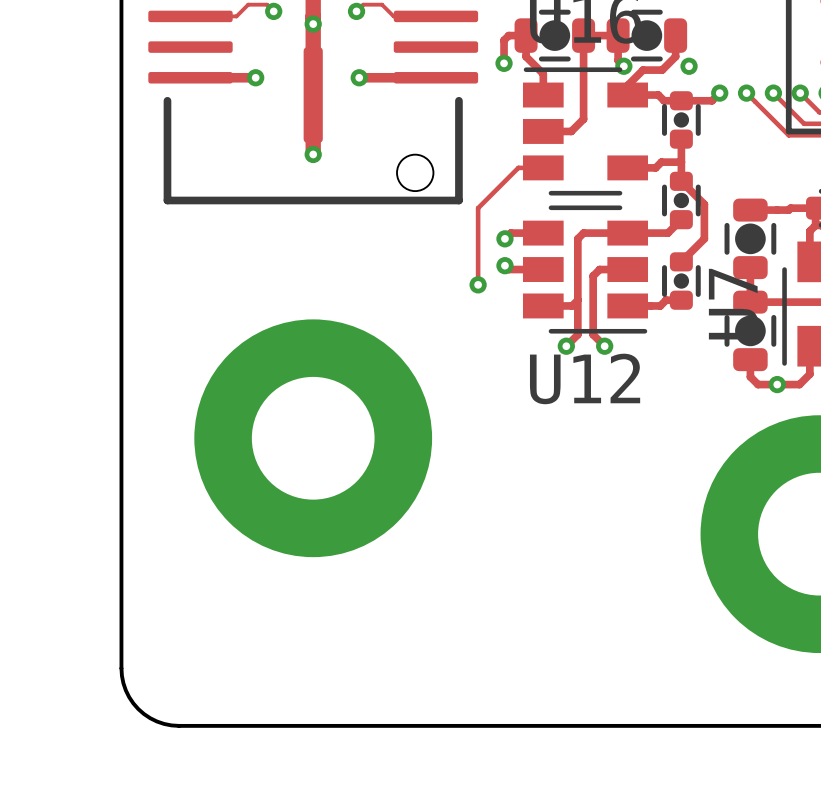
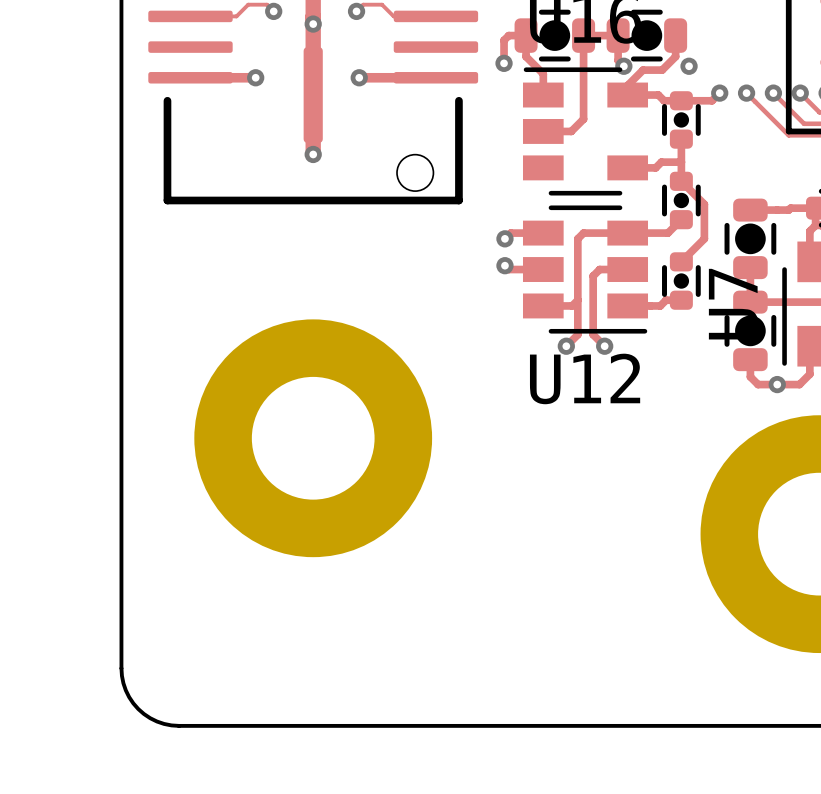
track: (543, 167) (518, 167) (478, 208) (478, 284) -> none
via: (478, 284) -> none

